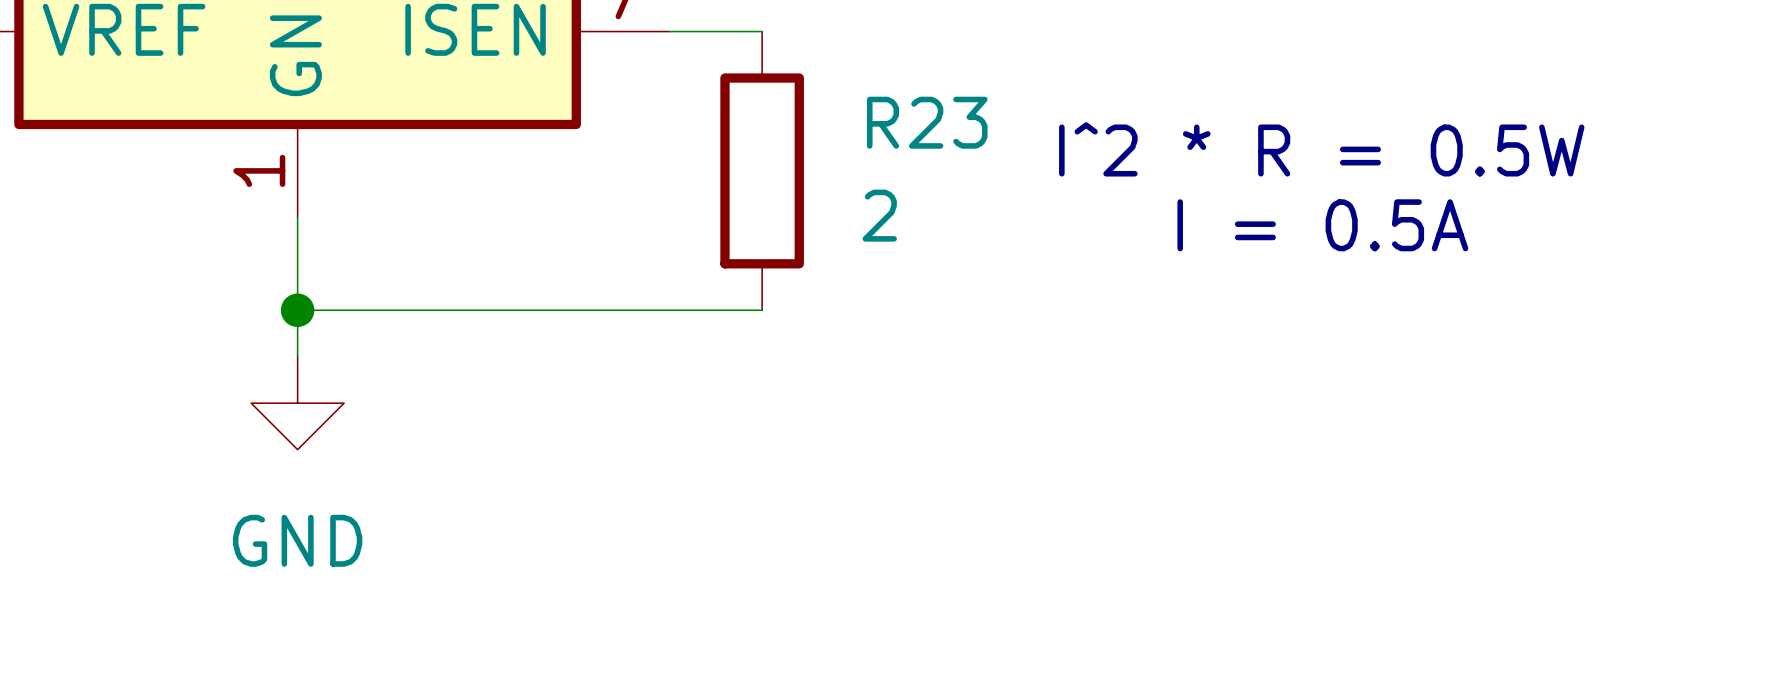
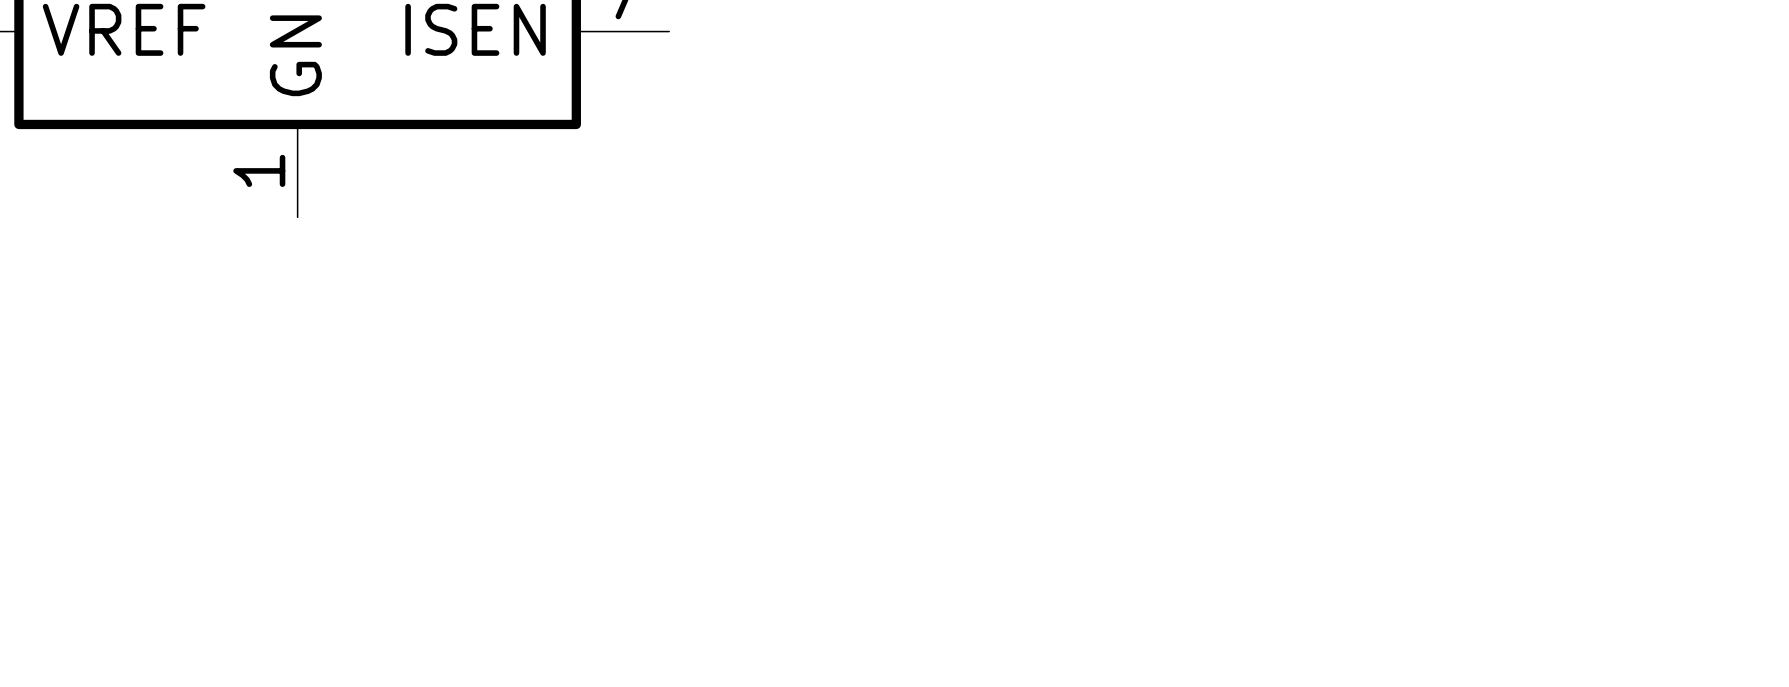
wire: (669, 31) (762, 31) -> none
text: I^2 * R = 0.5W (1321, 149) -> none
R23: 2 (762, 170) -> none
wire: (297, 217) (297, 356) -> none
text: I = 0.5A (1322, 225) -> none
wire: (297, 310) (762, 310) -> none
junction: (297, 310) -> none
power symbol: GND (297, 403) -> none

